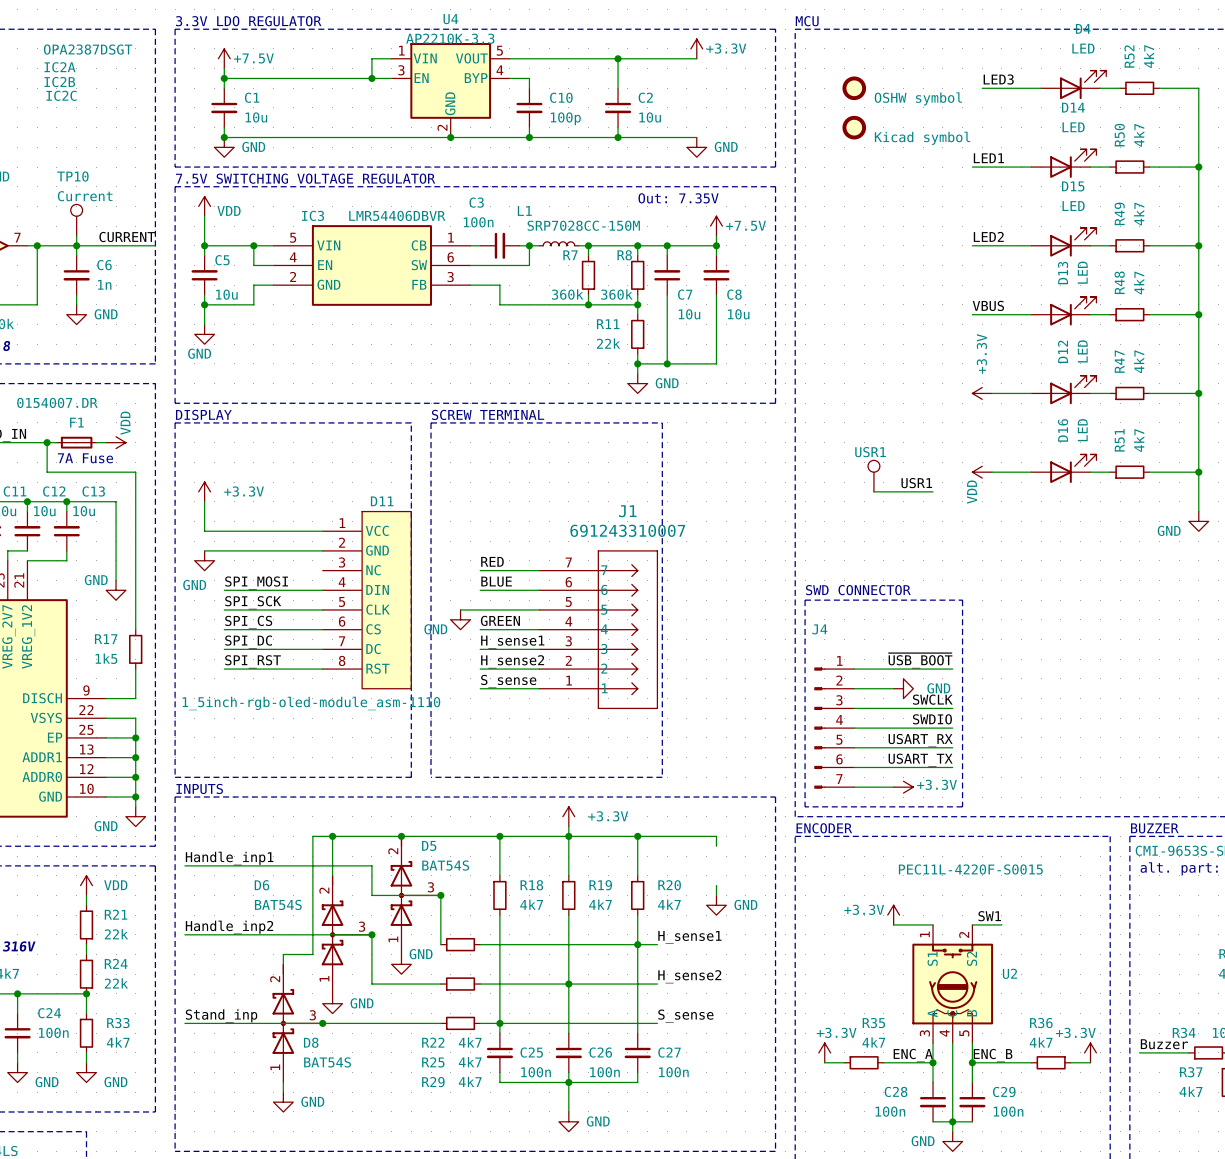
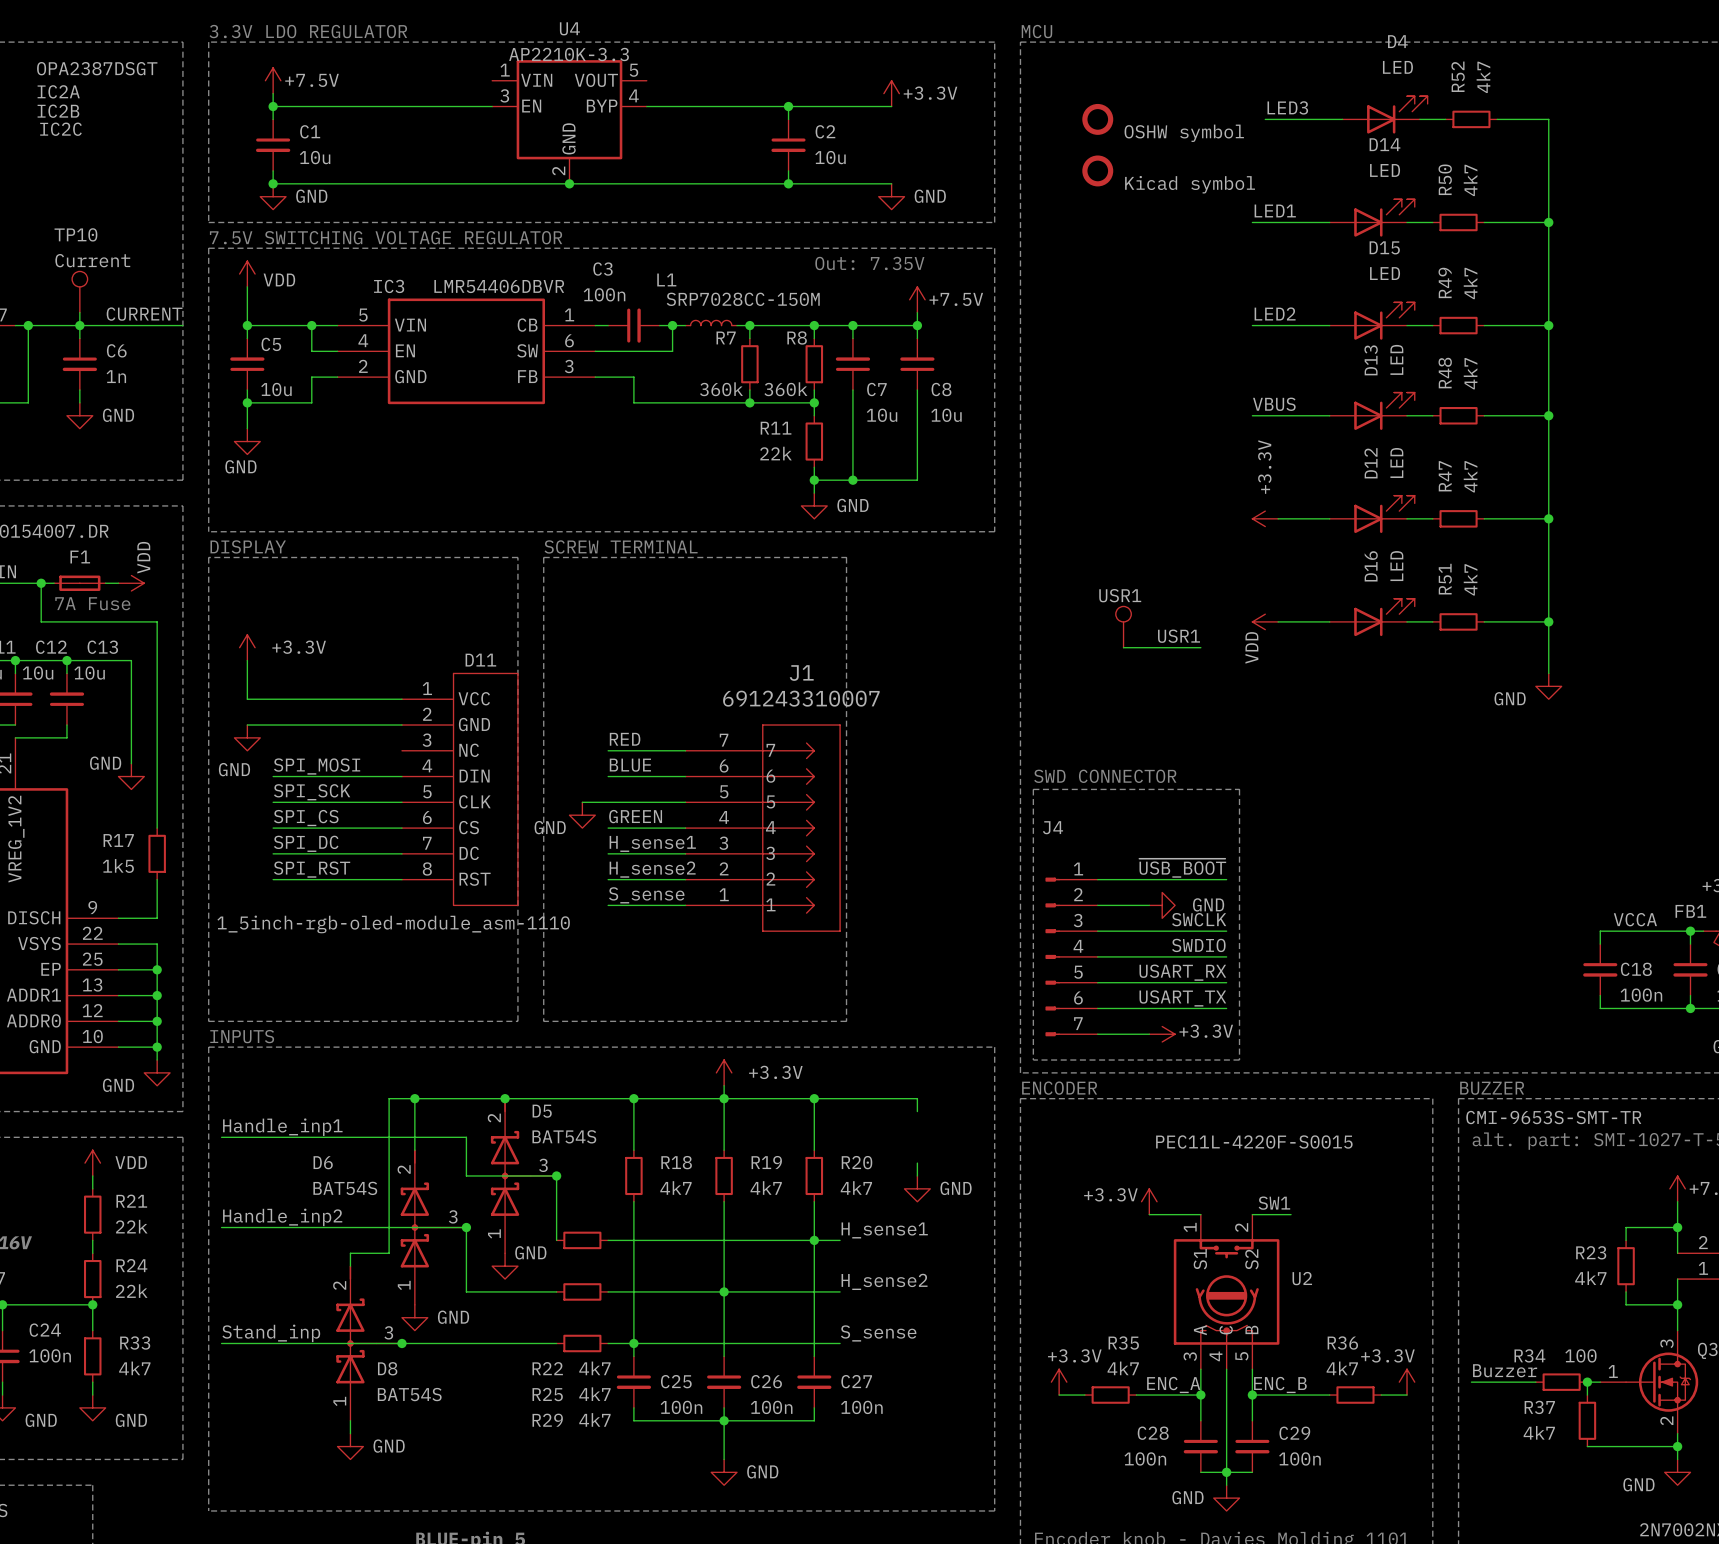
power symbol position: +3.3V (696, 48) -> +3.3V (891, 93)
wire: (391, 58) (371, 58) (371, 78) -> none
wire: (509, 58) (696, 58) -> none
wire: (618, 58) (618, 78) -> none
junction position: (618, 58) -> (788, 106)
junction: (371, 78) -> none
wire: (529, 78) (529, 88) -> (672, 106) (891, 106)
C10: 100p (529, 107) -> none
wire: (529, 127) (529, 137) -> none
junction: (529, 137) -> none

